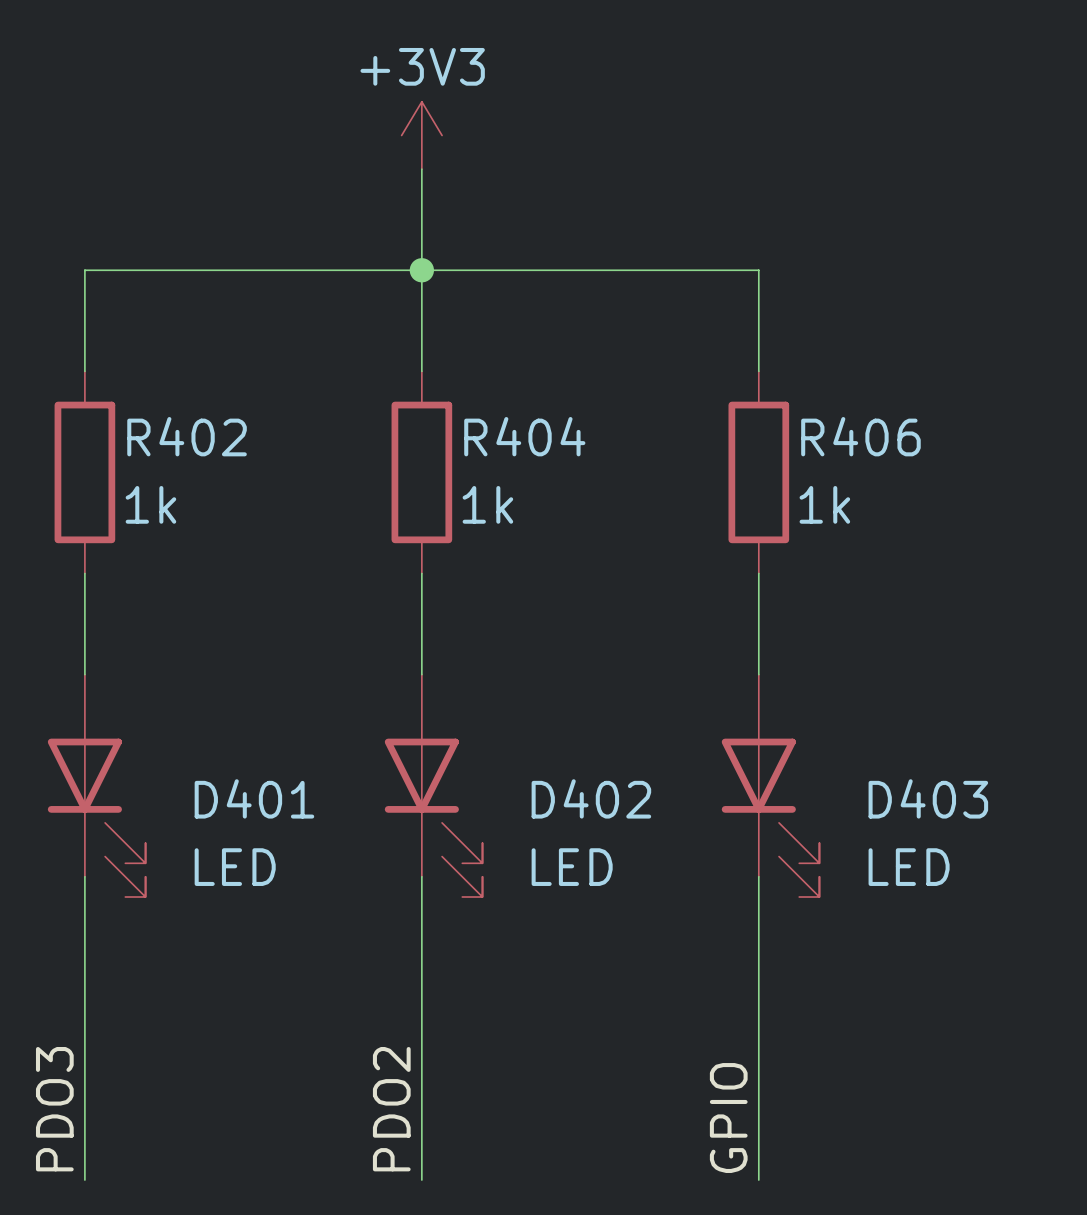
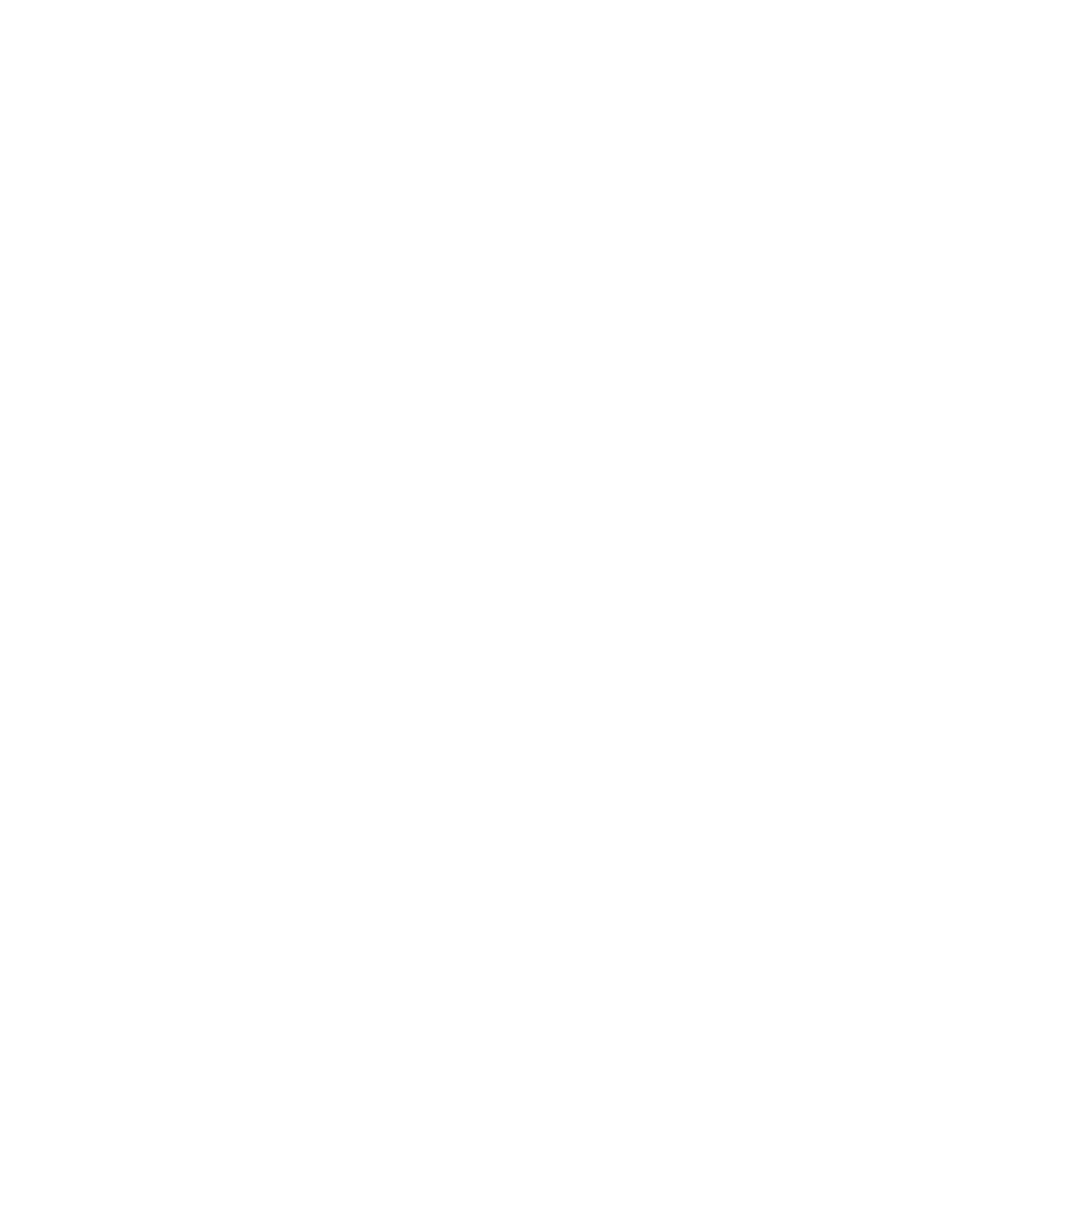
power symbol: +3V3 (421, 135) -> none
wire: (421, 169) (421, 371) -> none
junction: (421, 270) -> none
wire: (84, 371) (84, 270) (758, 270) (758, 371) -> none
R402: 1k (84, 472) -> none
R404: 1k (421, 472) -> none
R406: 1k (758, 472) -> none
wire: (84, 573) (84, 674) -> none
wire: (421, 573) (421, 674) -> none
wire: (758, 573) (758, 674) -> none
D401: LED (96, 785) -> none
D402: LED (433, 785) -> none
D403: LED (770, 785) -> none
wire: (84, 876) (84, 1180) -> none
wire: (421, 876) (421, 1180) -> none
wire: (758, 876) (758, 1180) -> none
label: PDO3 (54, 1109) -> none
label: PDO2 (391, 1109) -> none
label: GPIO (728, 1118) -> none

